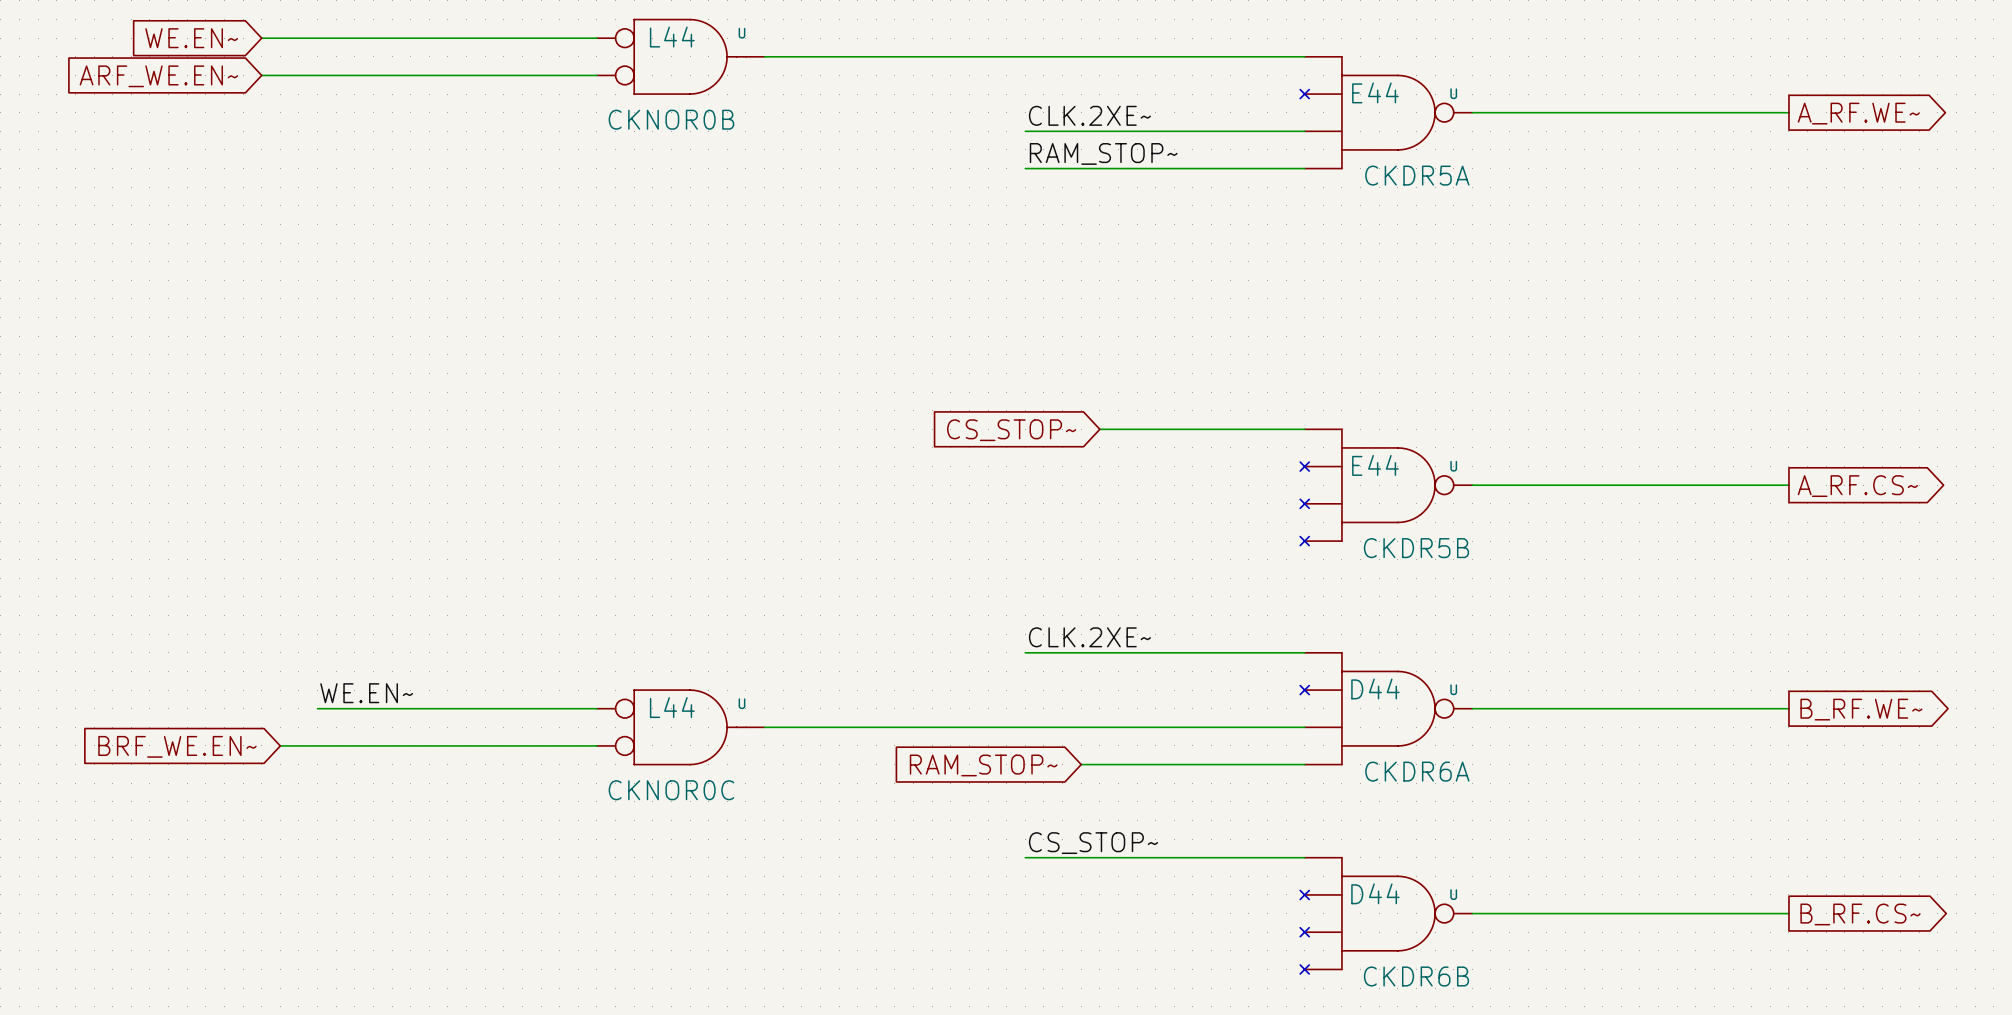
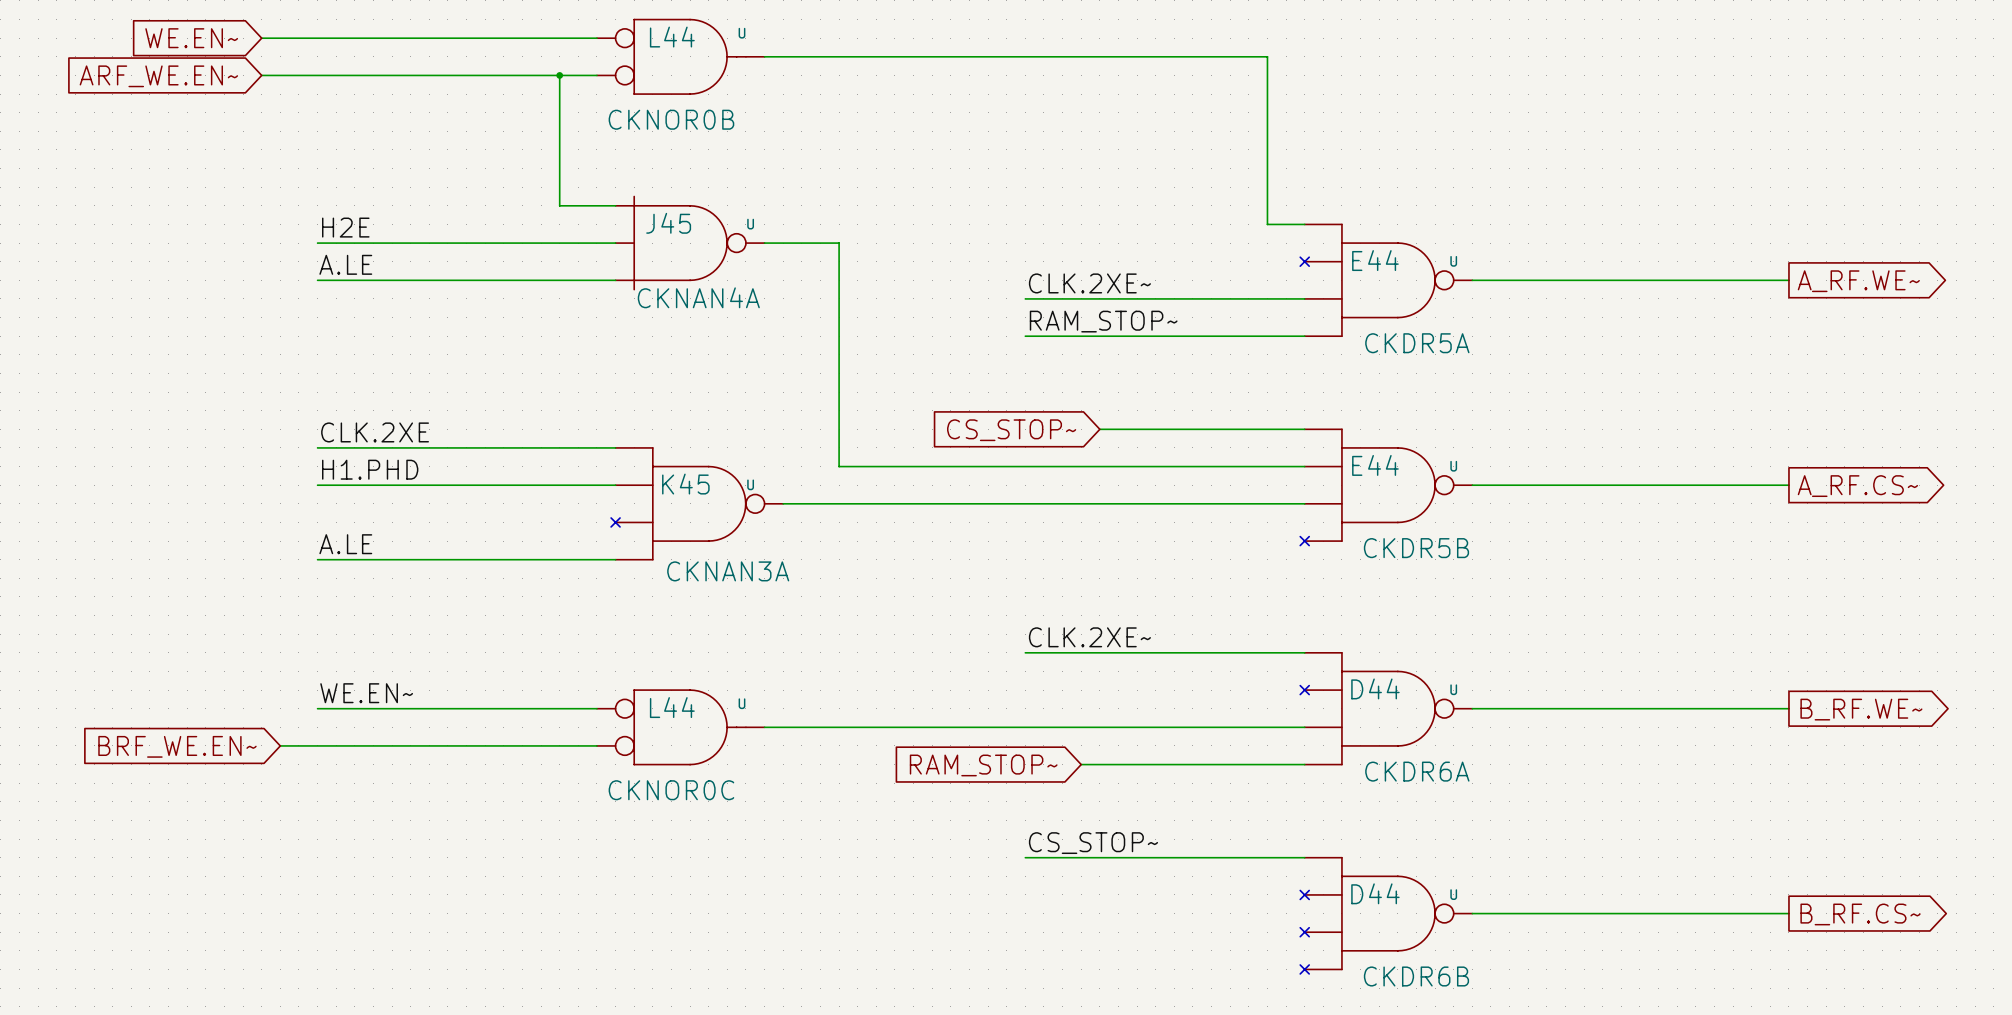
wire: (1267, 56) (1304, 56) -> (1267, 56) (1267, 224) (1304, 224)
wire: none -> (559, 75) (559, 205) (615, 205)
junction: none -> (559, 75)
no-connect mark: (1304, 94) -> none
U position: (1388, 112) -> (1388, 280)
wire: (1472, 112) (1788, 112) -> (1472, 280) (1788, 280)
global label position: A_RF.WE~ (1858, 113) -> A_RF.WE~ (1858, 281)
label position: CLK.2XE~ (1089, 115) -> CLK.2XE~ (1089, 283)
wire: (1025, 131) (1304, 131) -> (1025, 298) (1304, 298)
label position: RAM_STOP~ (1103, 153) -> RAM_STOP~ (1103, 321)
wire: (1025, 168) (1304, 168) -> (1025, 336) (1304, 336)
label: none -> H2E (345, 227)
wire: none -> (317, 243) (615, 243)
U: none -> (690, 243)
wire: none -> (764, 243) (839, 243) (839, 466) (1304, 466)
no-connect mark: none -> (1304, 261)
label: none -> A.LE (345, 264)
wire: none -> (317, 280) (615, 280)
label: none -> CLK.2XE (375, 432)
wire: none -> (317, 447) (615, 447)
no-connect mark: (1304, 466) -> none
label: none -> H1.PHD (370, 469)
wire: none -> (317, 485) (615, 485)
U: none -> (699, 503)
wire: none -> (783, 503) (1304, 503)
no-connect mark: (1304, 503) -> none
no-connect mark: none -> (615, 522)
label: none -> A.LE (345, 544)
wire: none -> (317, 559) (615, 559)

